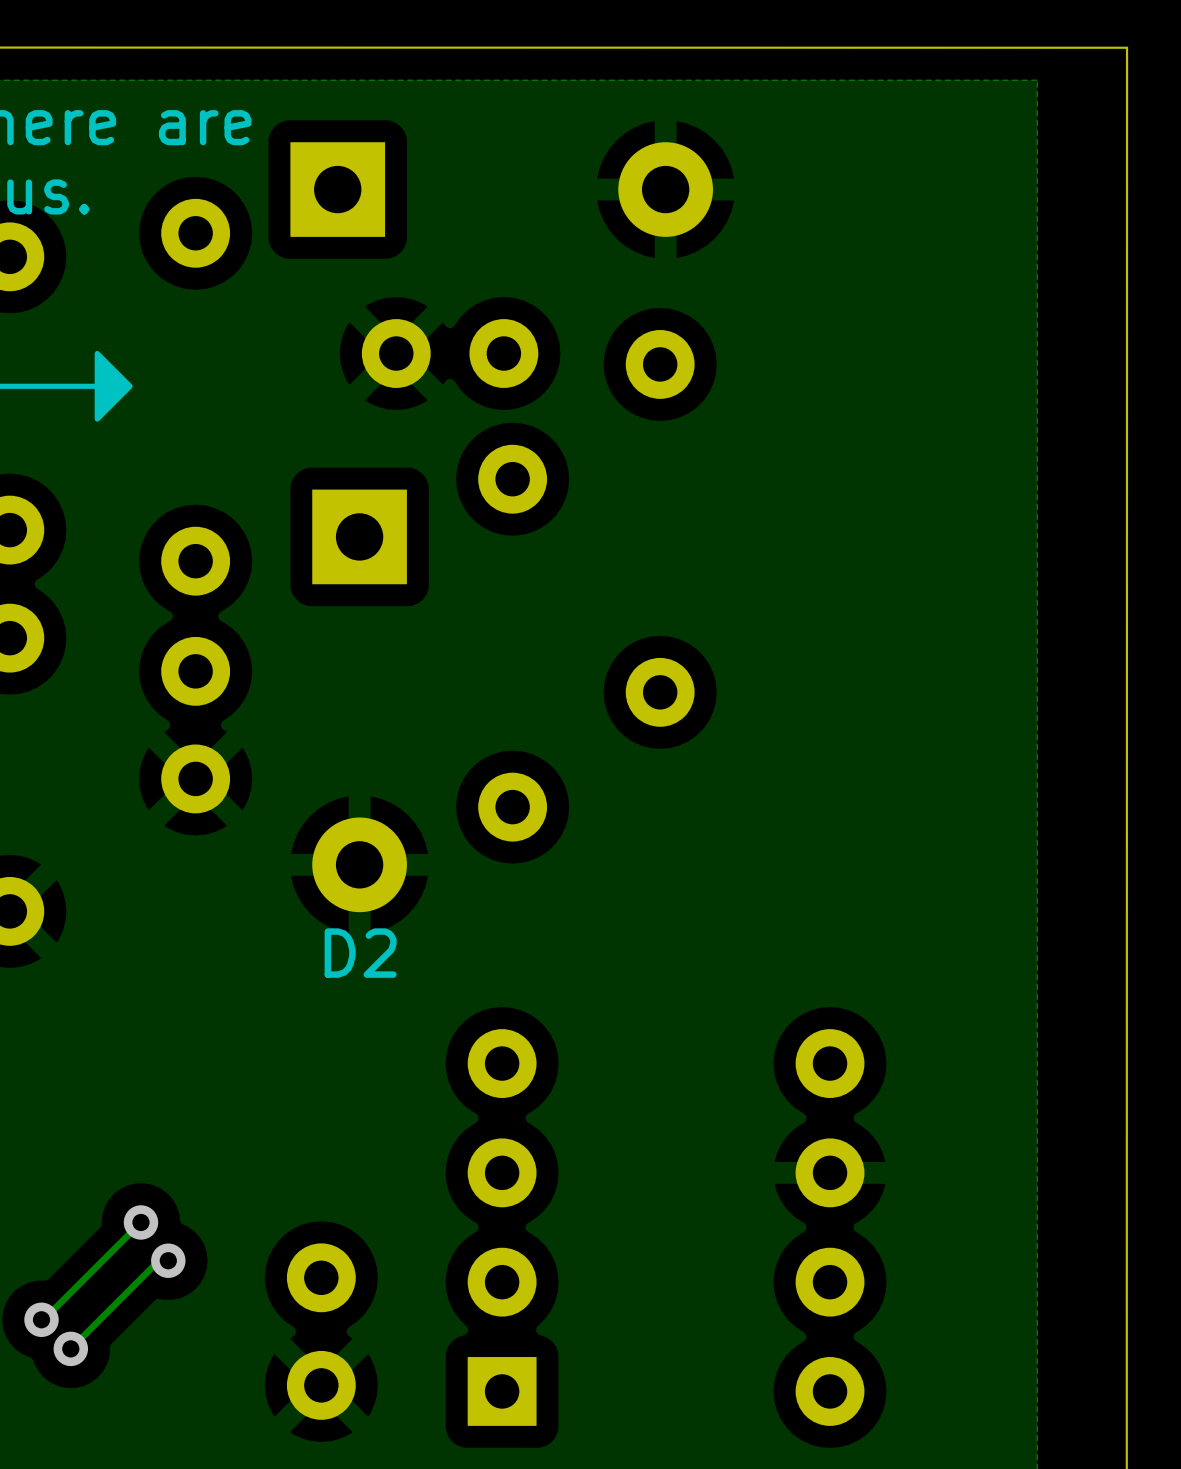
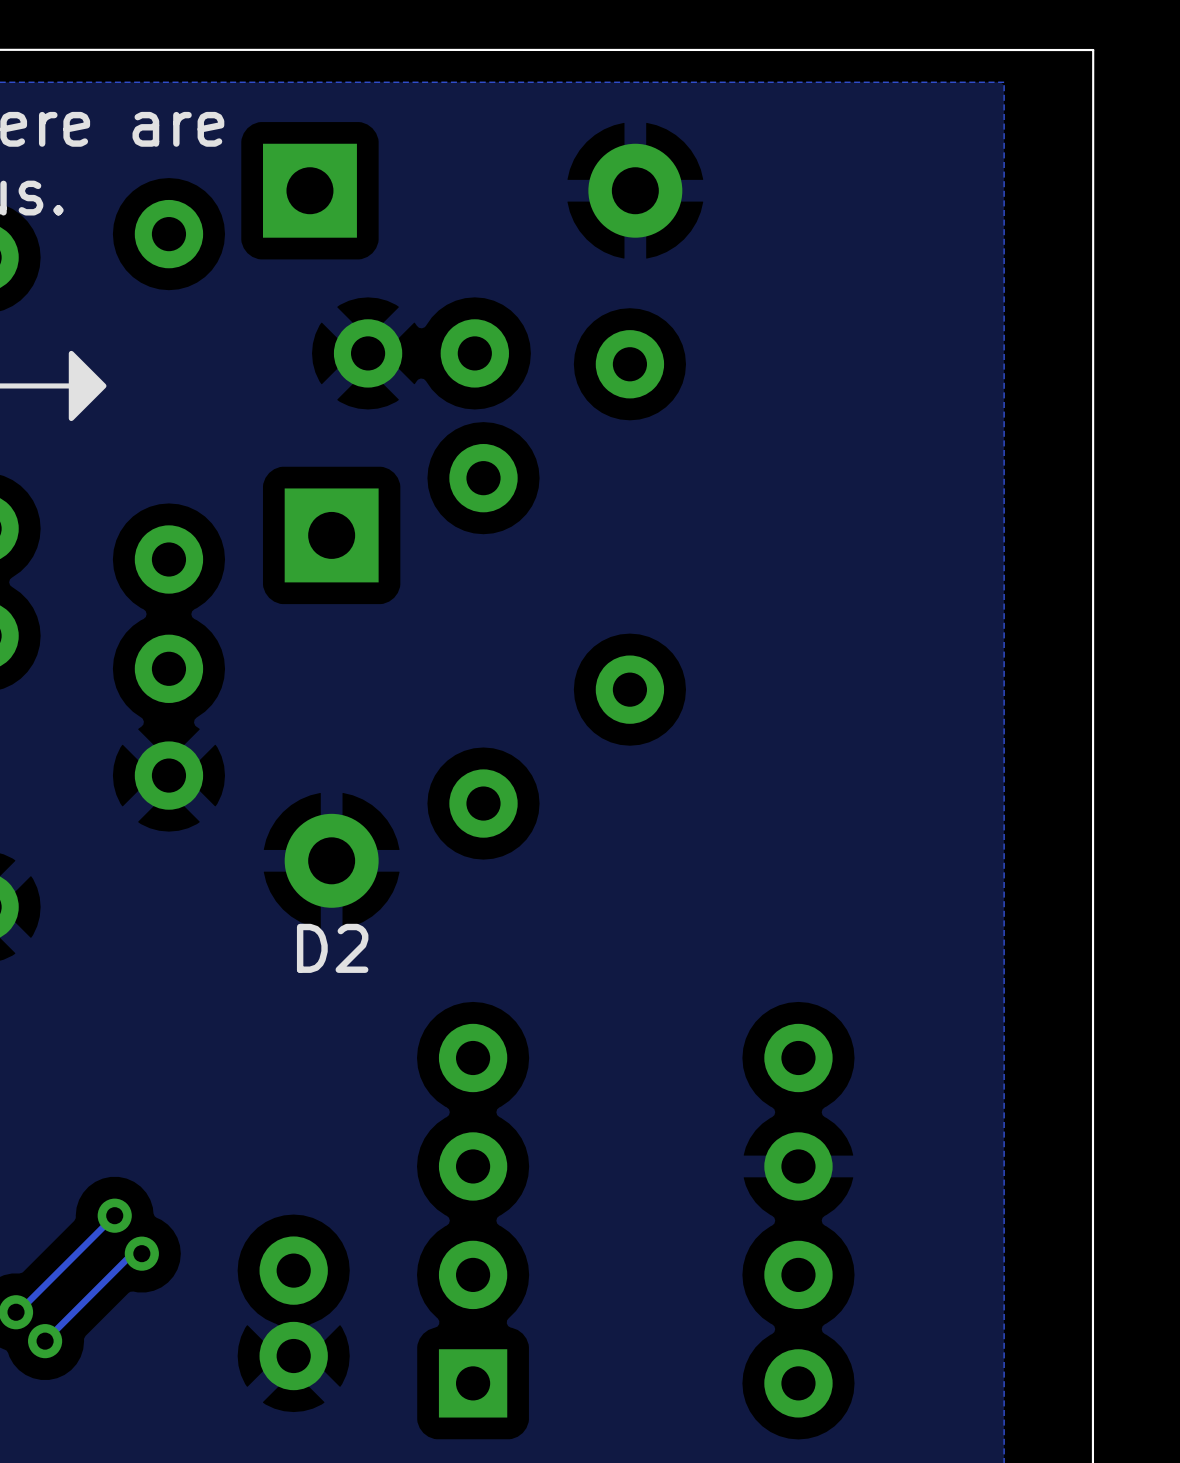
part footprint: [286, 1243, 356, 1420] -> [259, 1236, 328, 1391]

